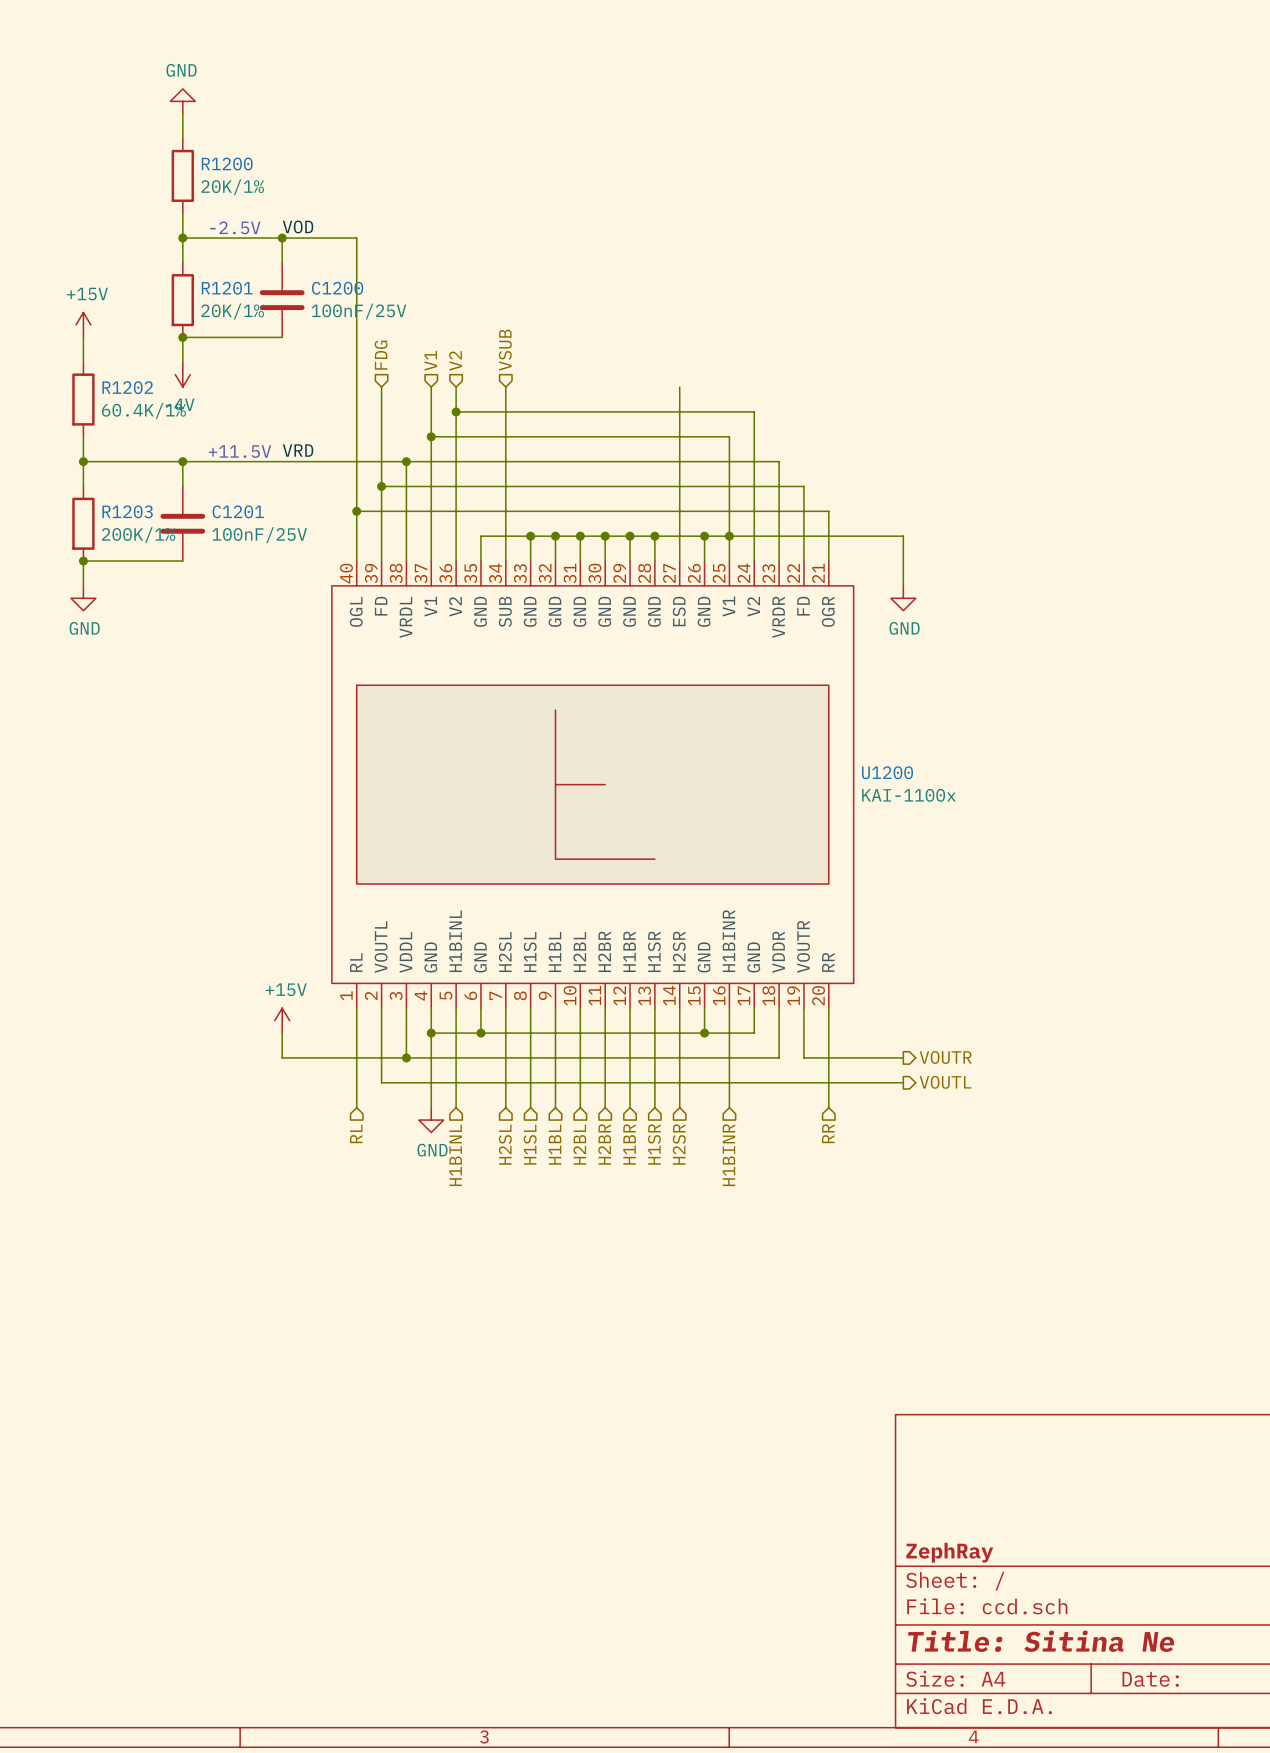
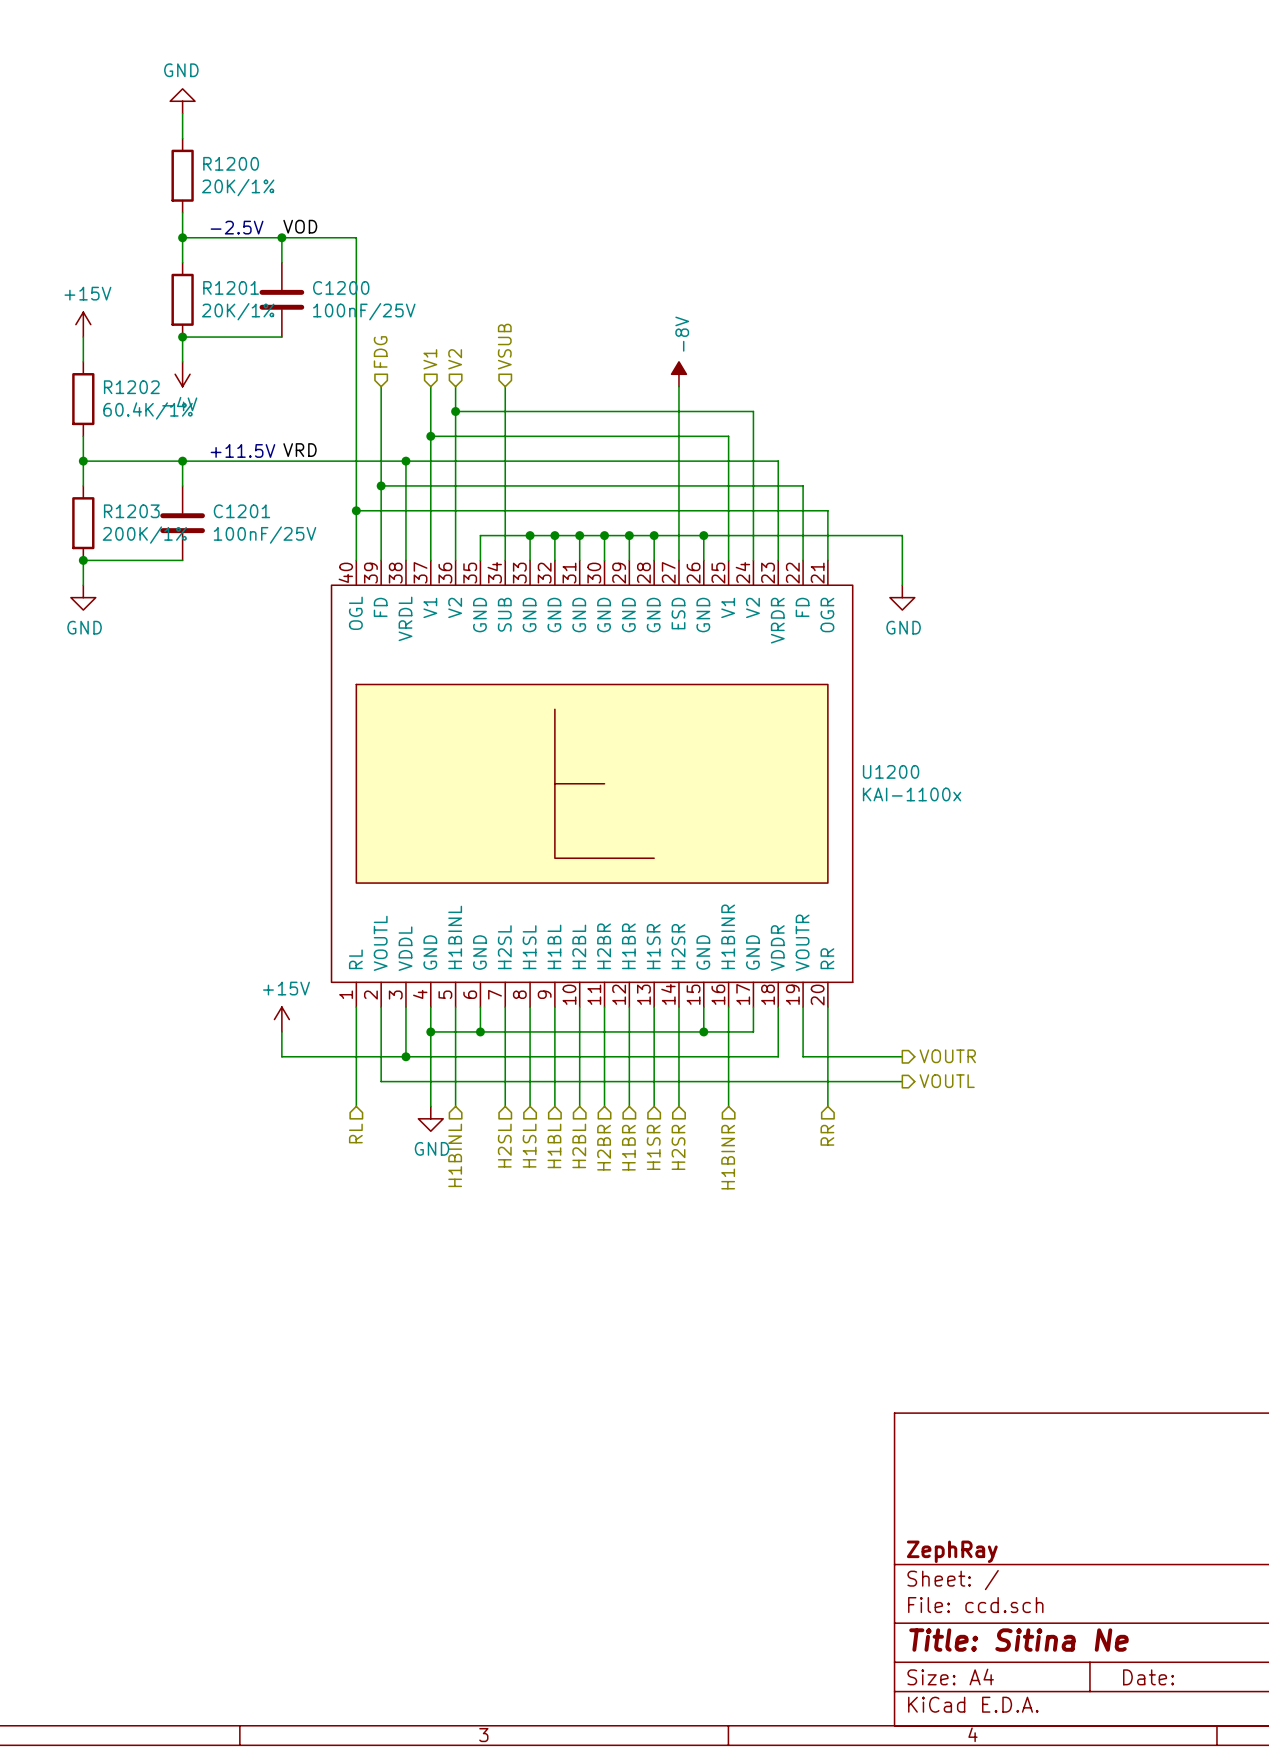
power symbol: none -> -8V (678, 374)
junction: (729, 536) -> none

